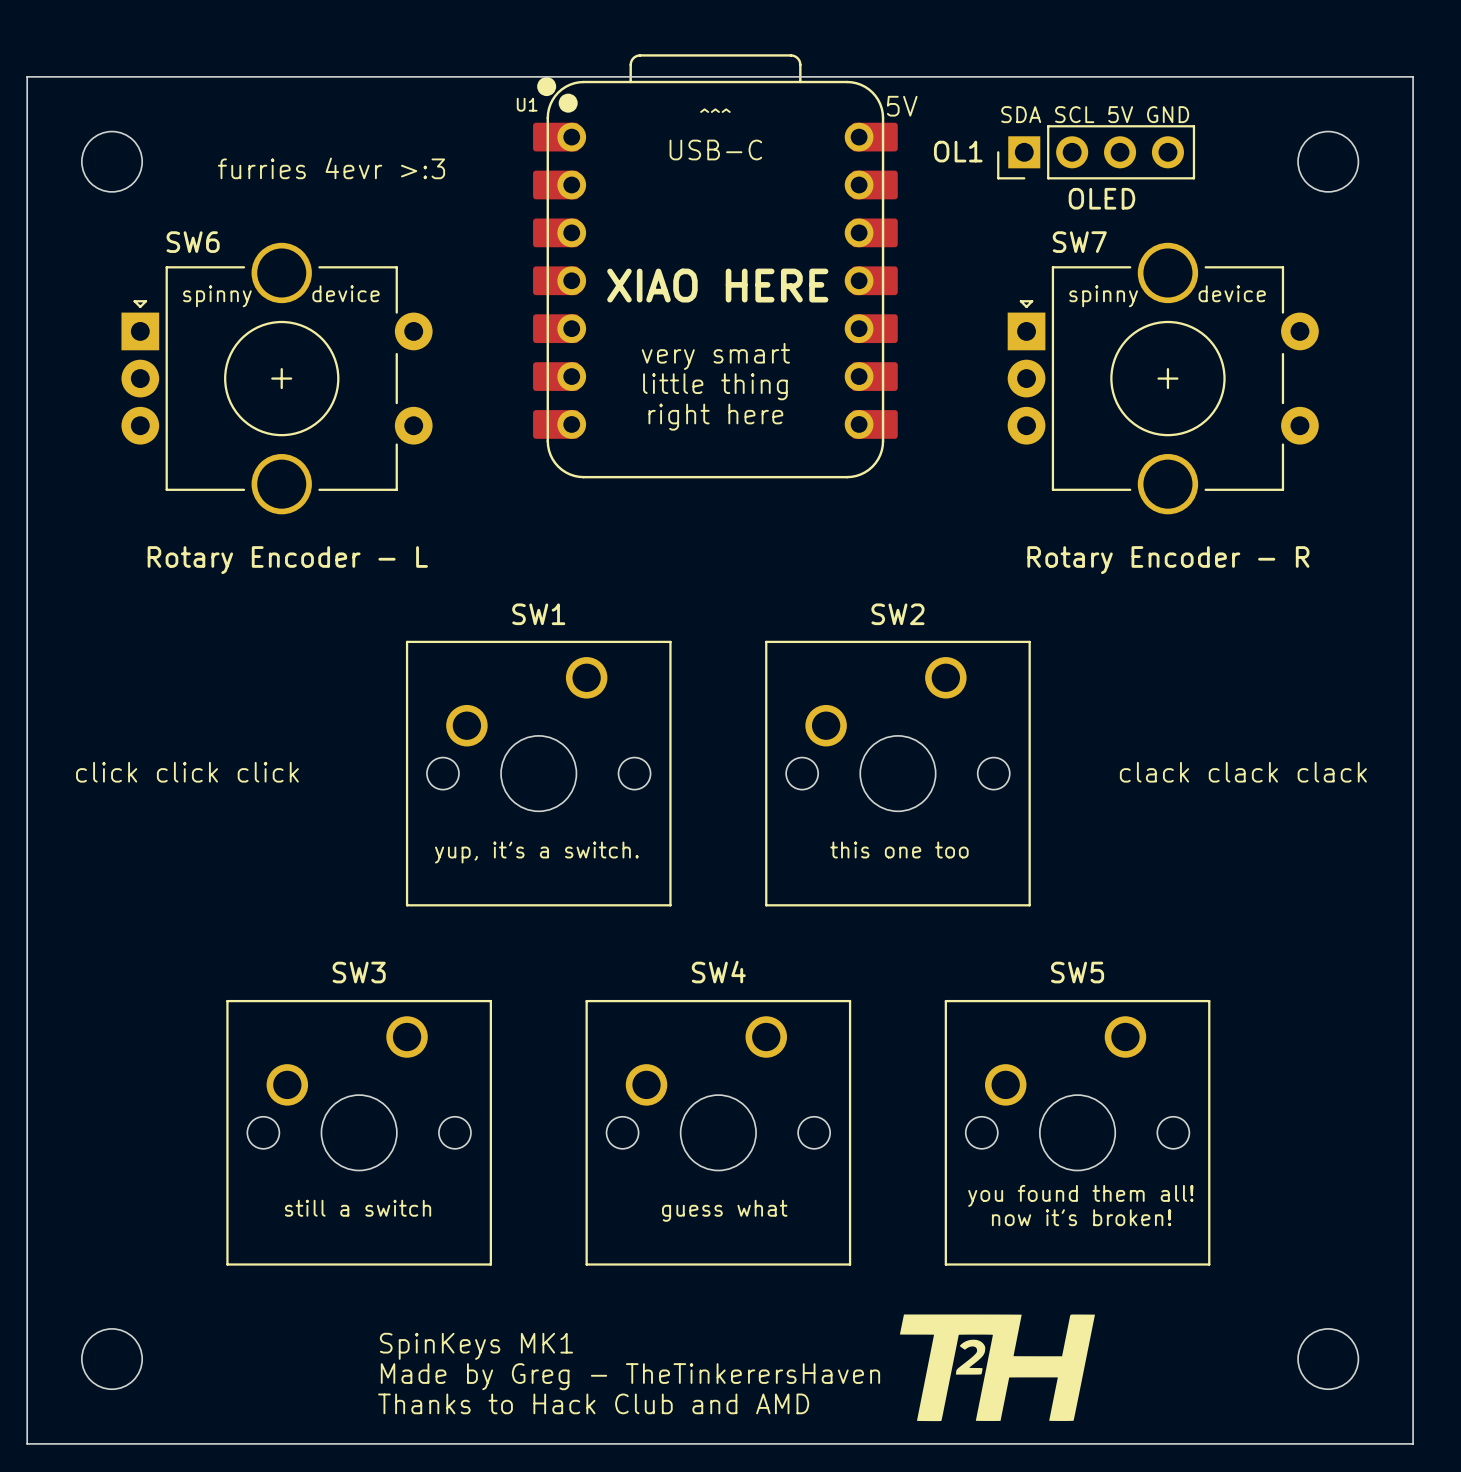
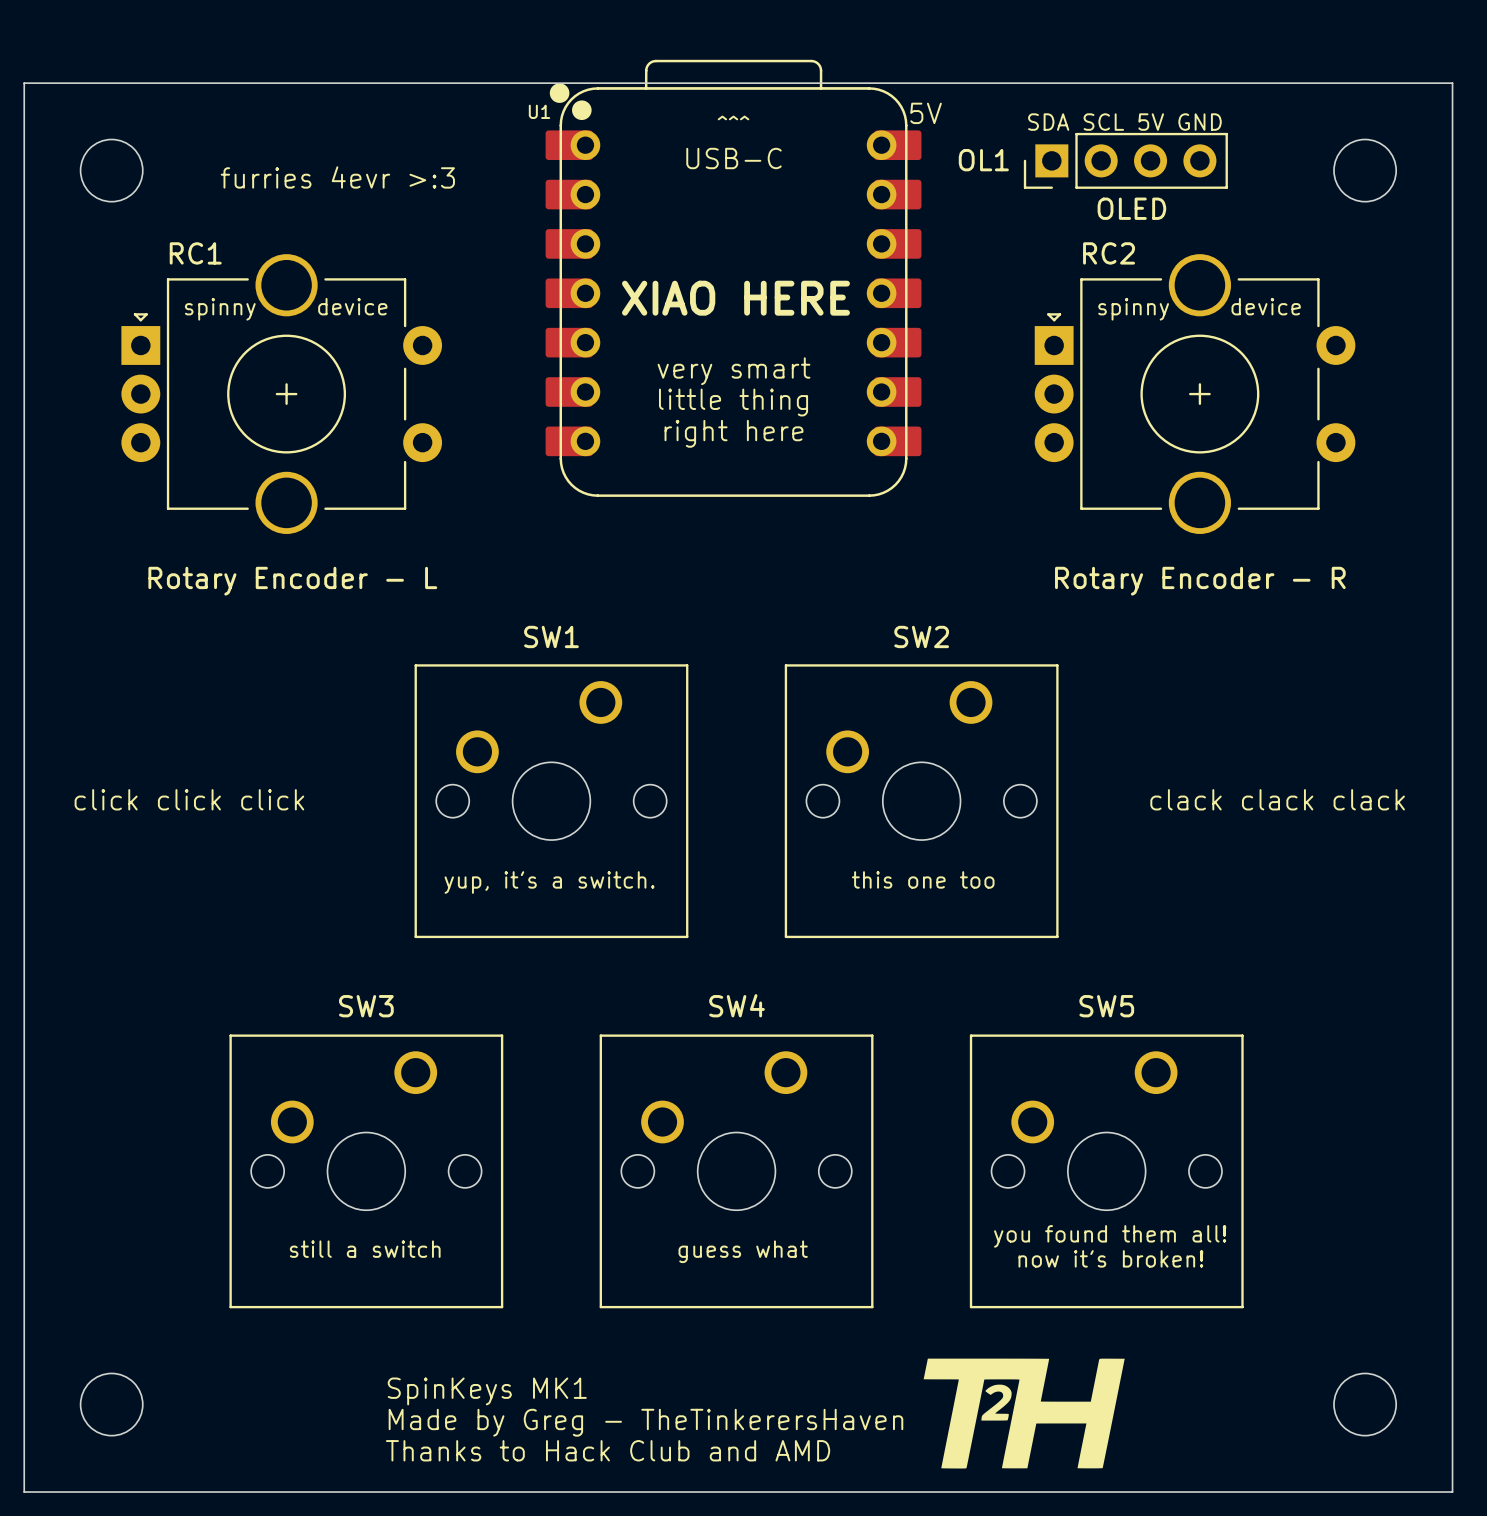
SW6 name: SW6 (193, 242) -> RC1 (195, 253)
SW7 name: SW7 (1079, 242) -> RC2 (1109, 253)

